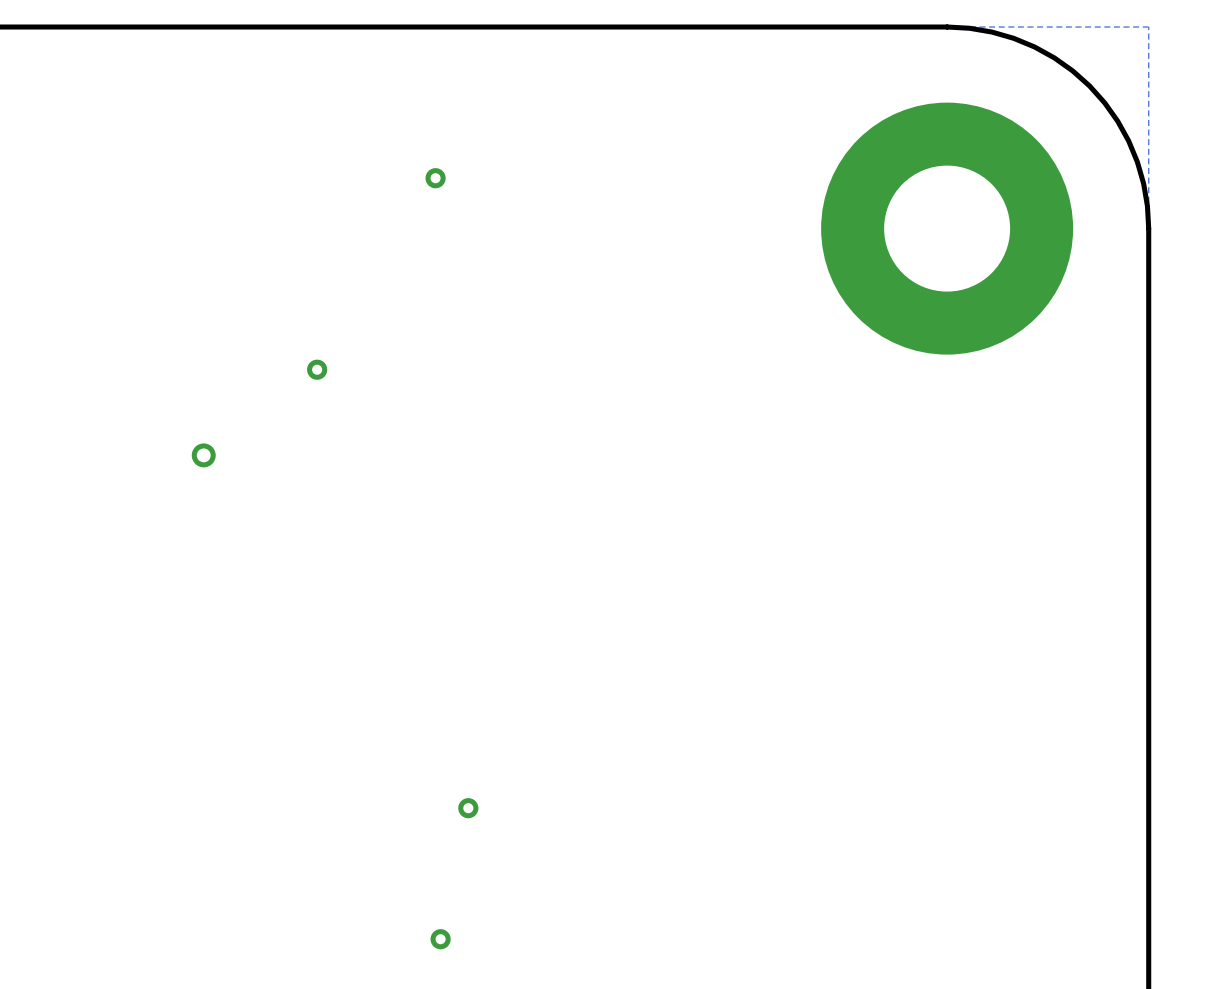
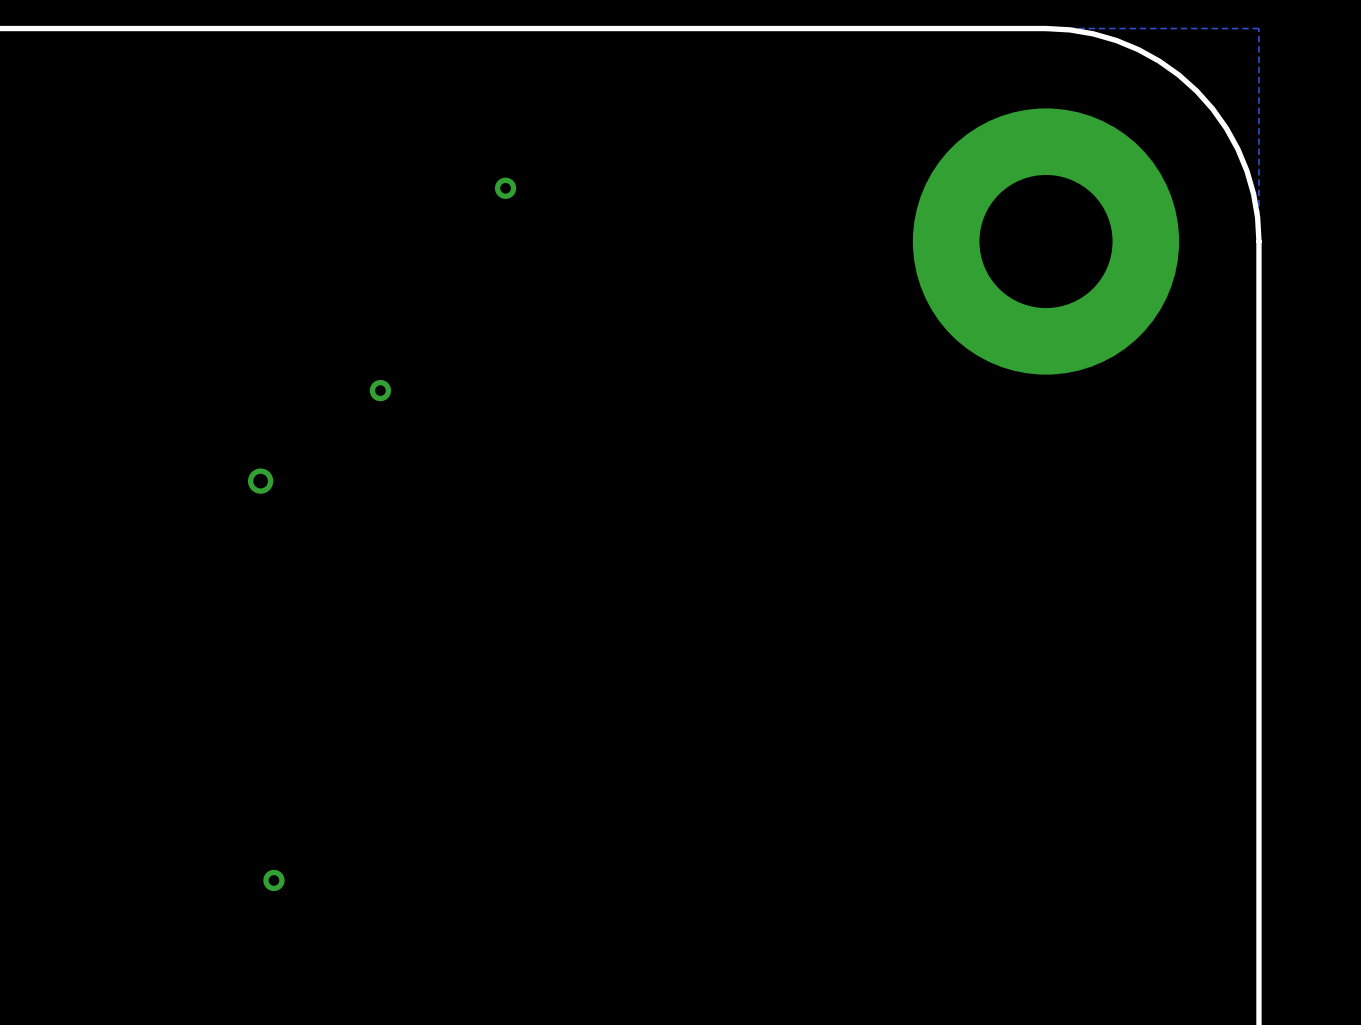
via: (468, 808) -> none
via: none -> (273, 880)
via: (440, 939) -> none

